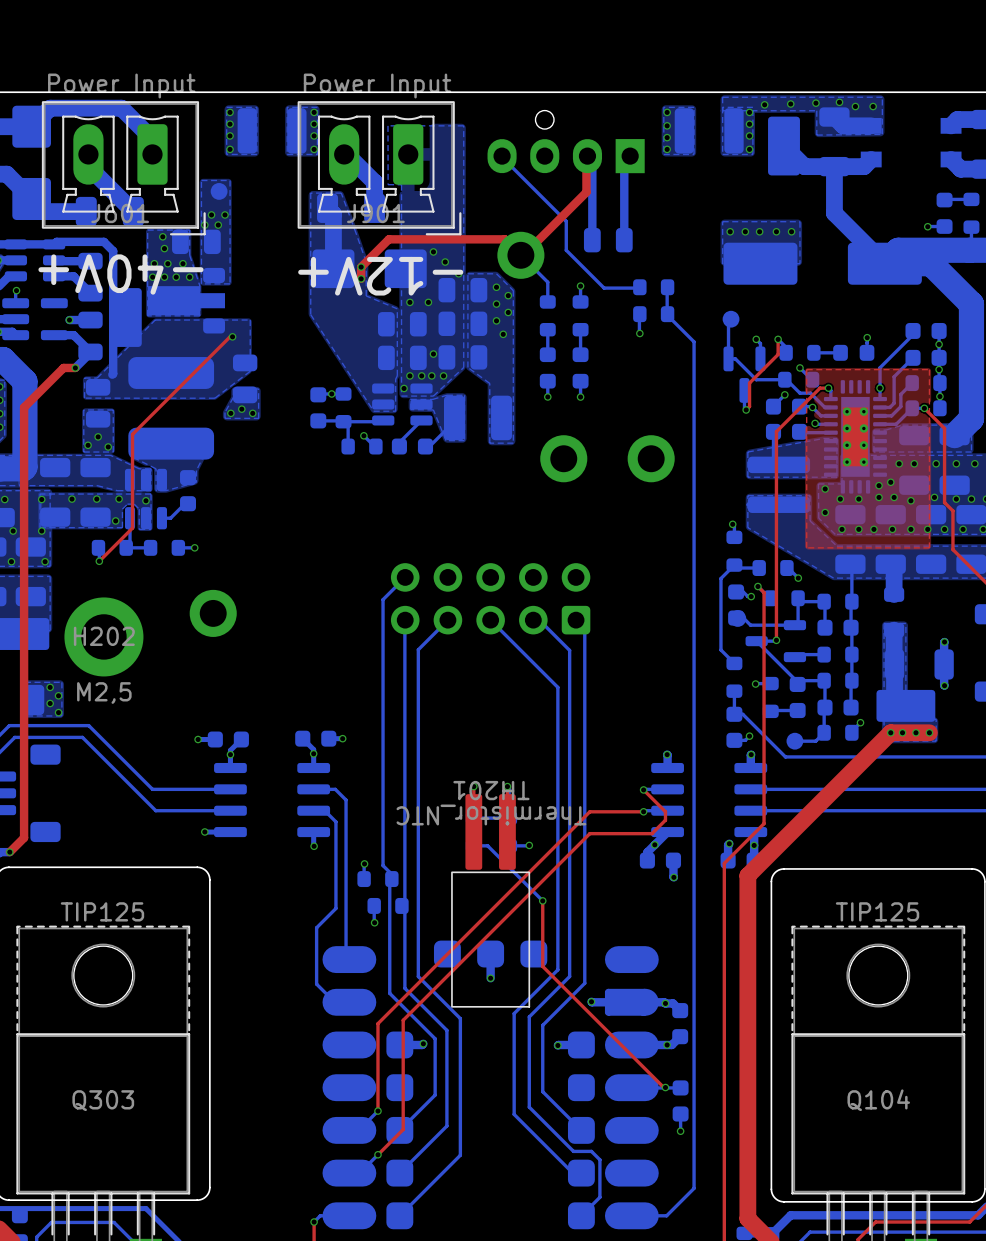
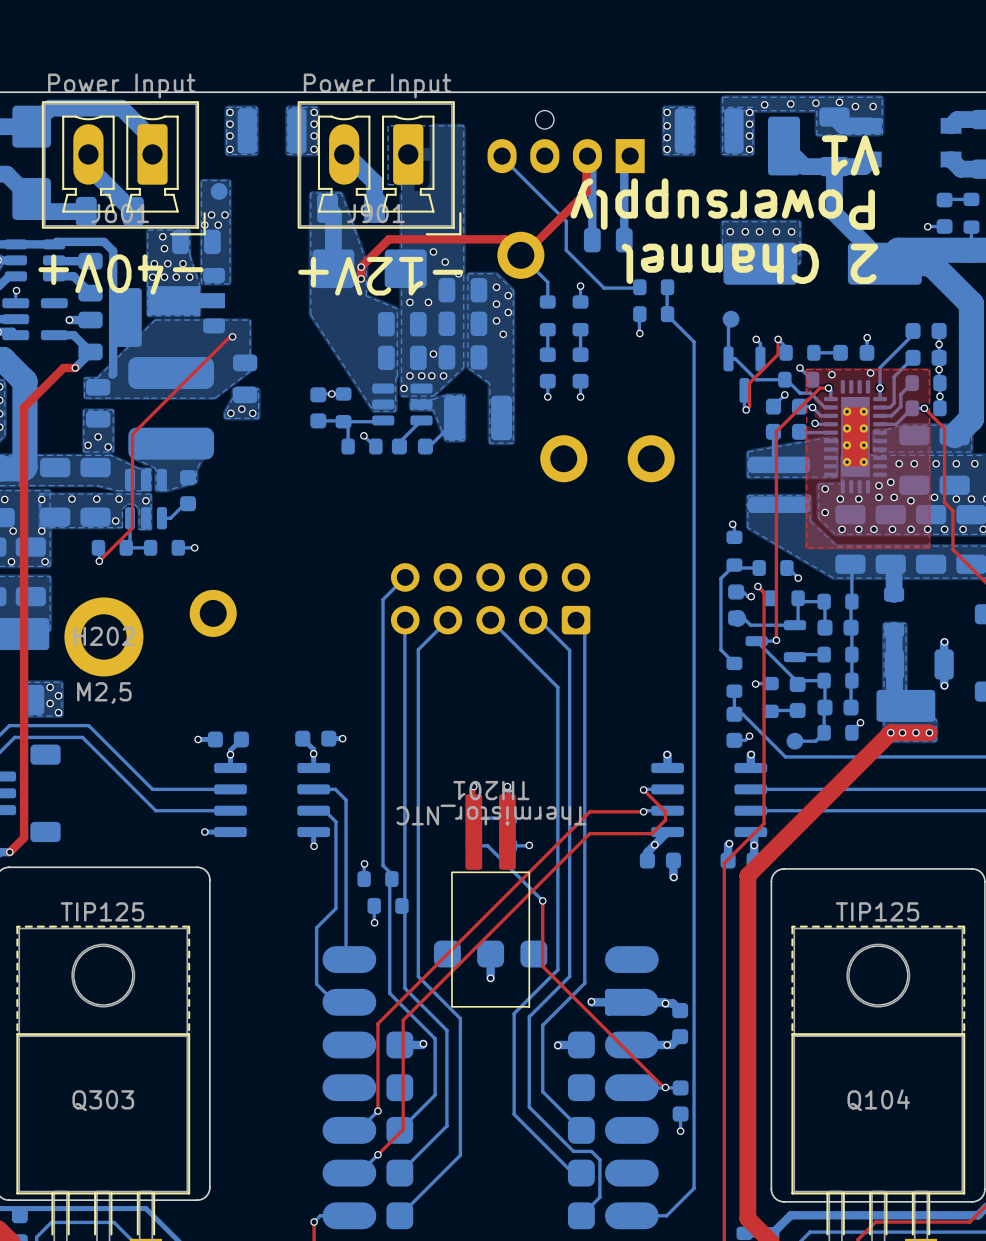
text: none -> V1 (850, 155)
text: none -> Powersupply (722, 204)
text: none -> 2 Channel (749, 263)
via: none -> (870, 373)
via: none -> (831, 374)

